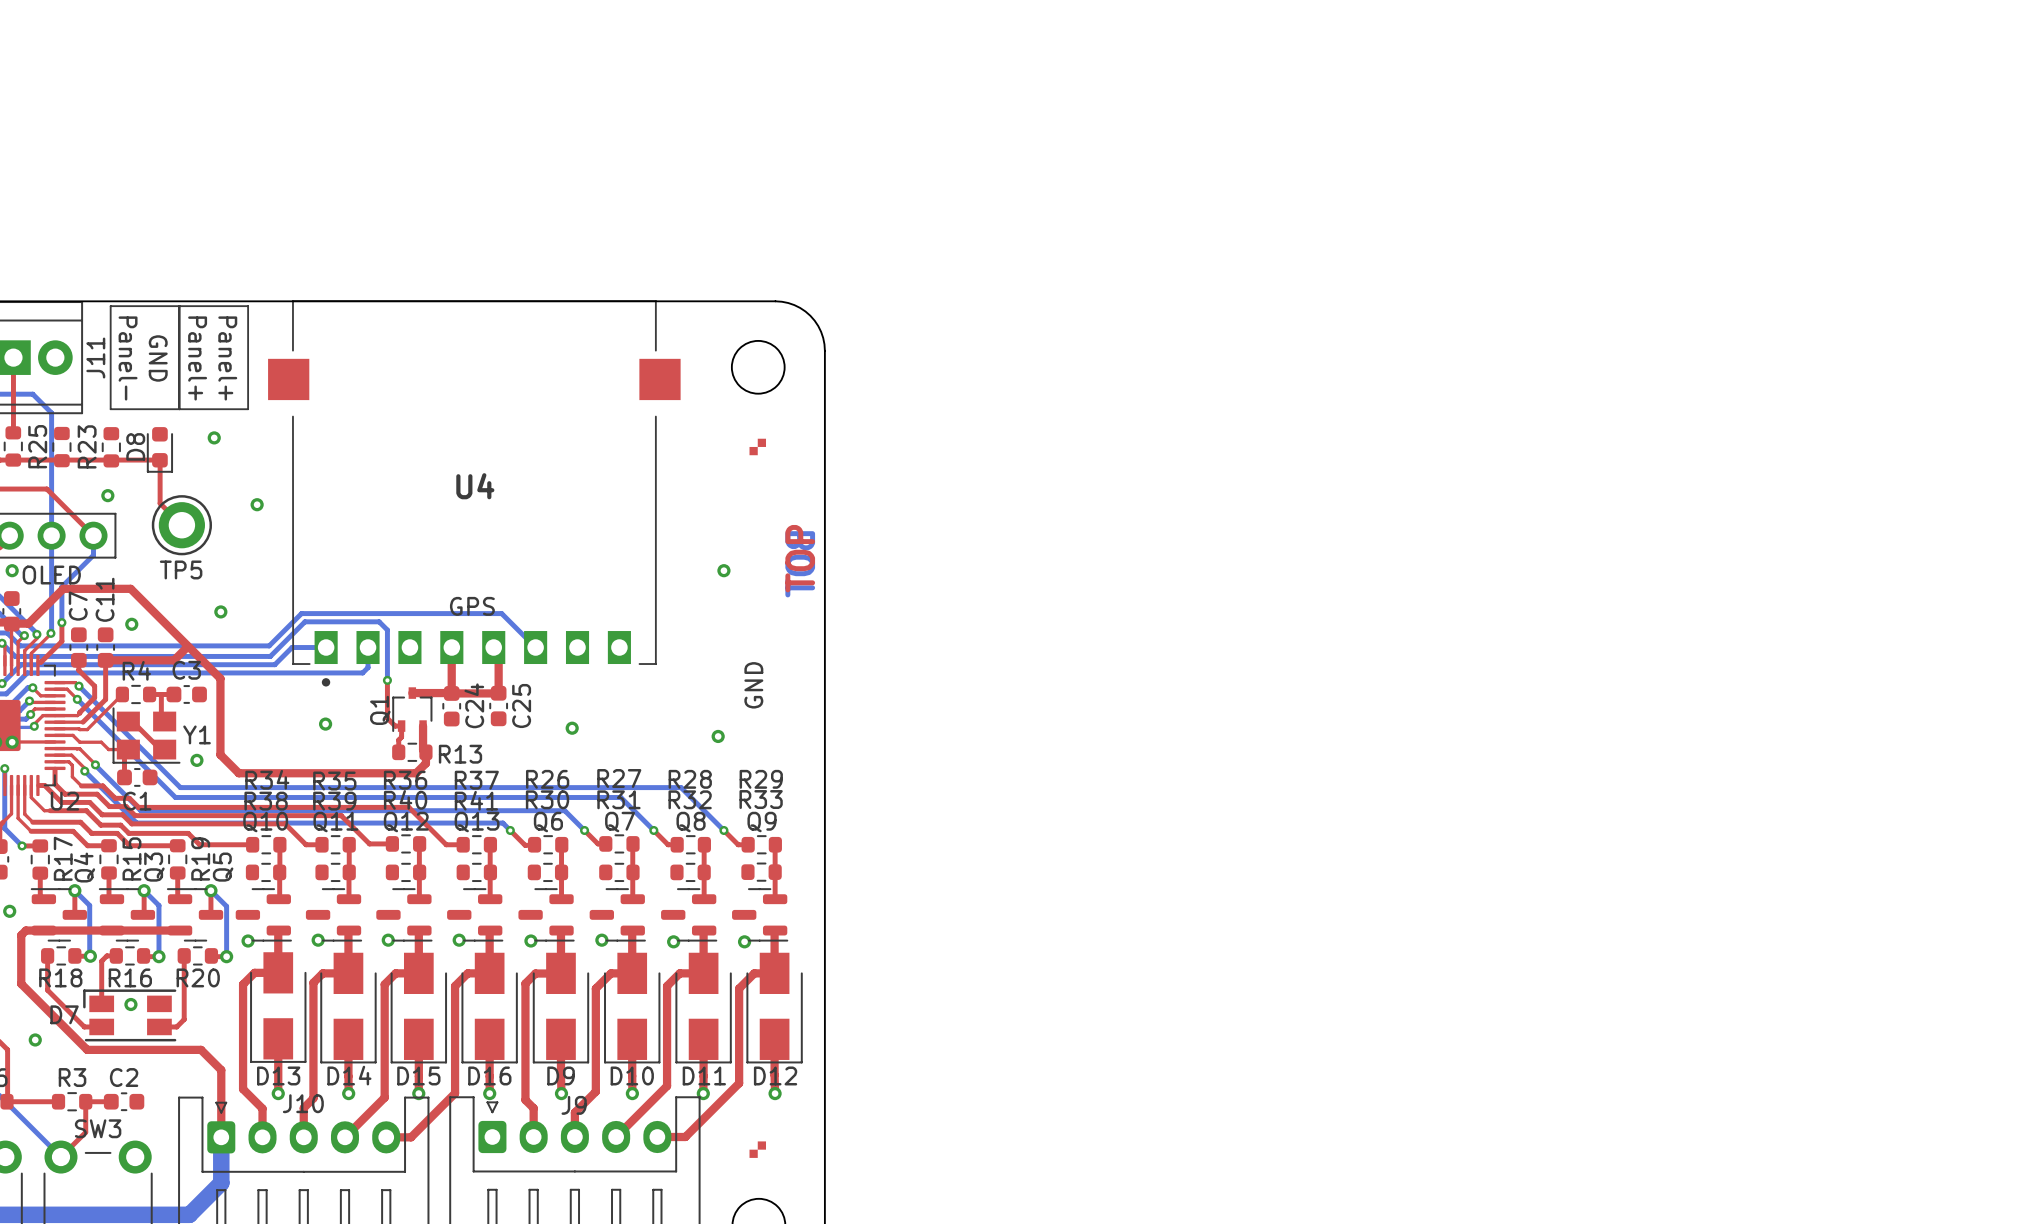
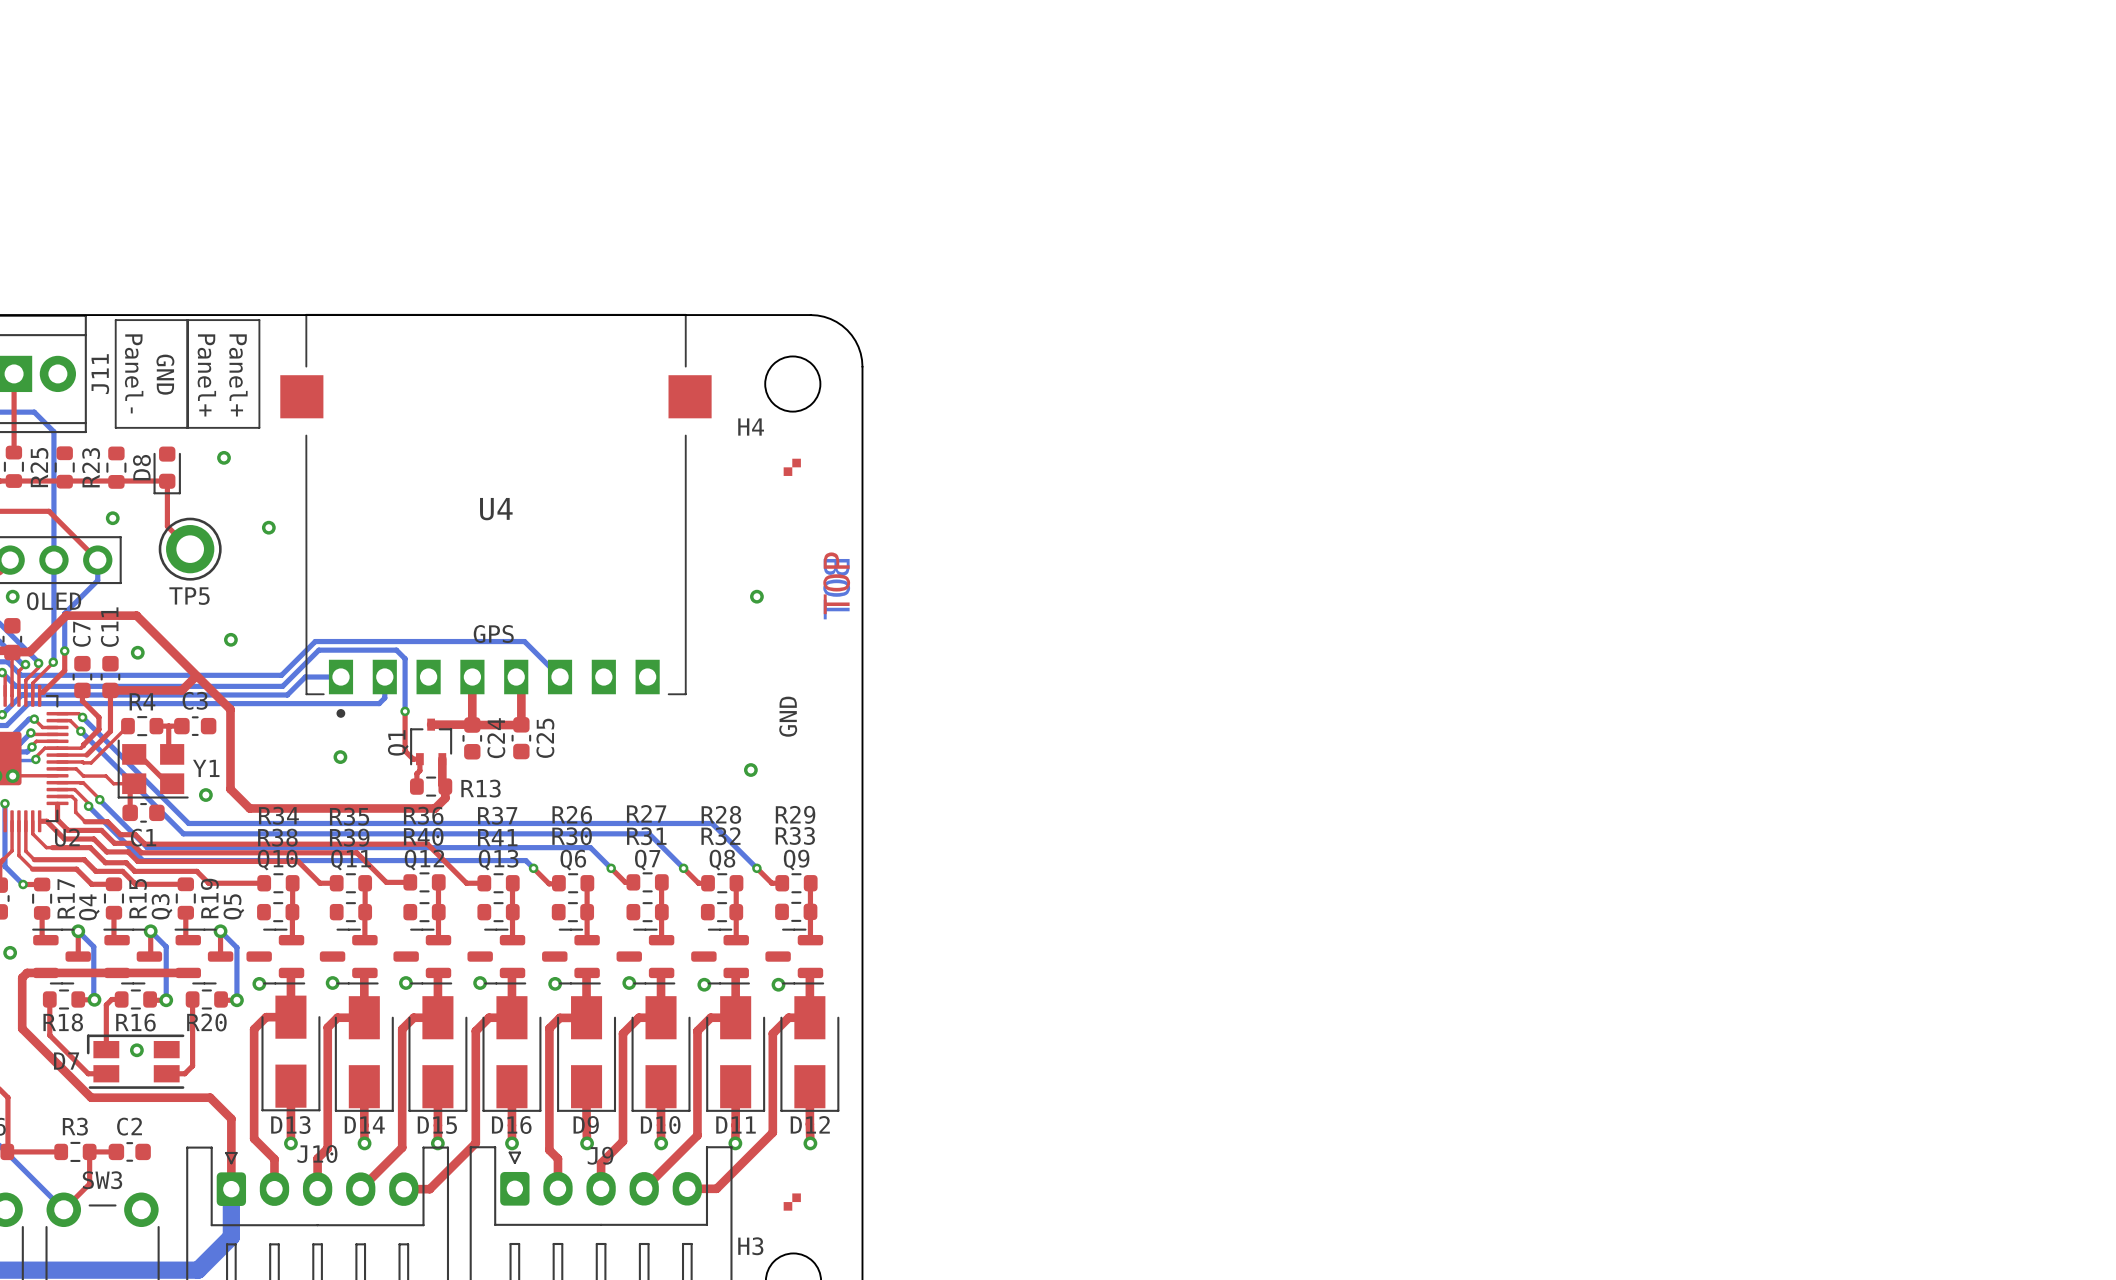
H4 name: none -> H4 (751, 427)
via: (572, 728) -> none
via: (35, 1039) -> none
H3 name: none -> H3 (750, 1246)

